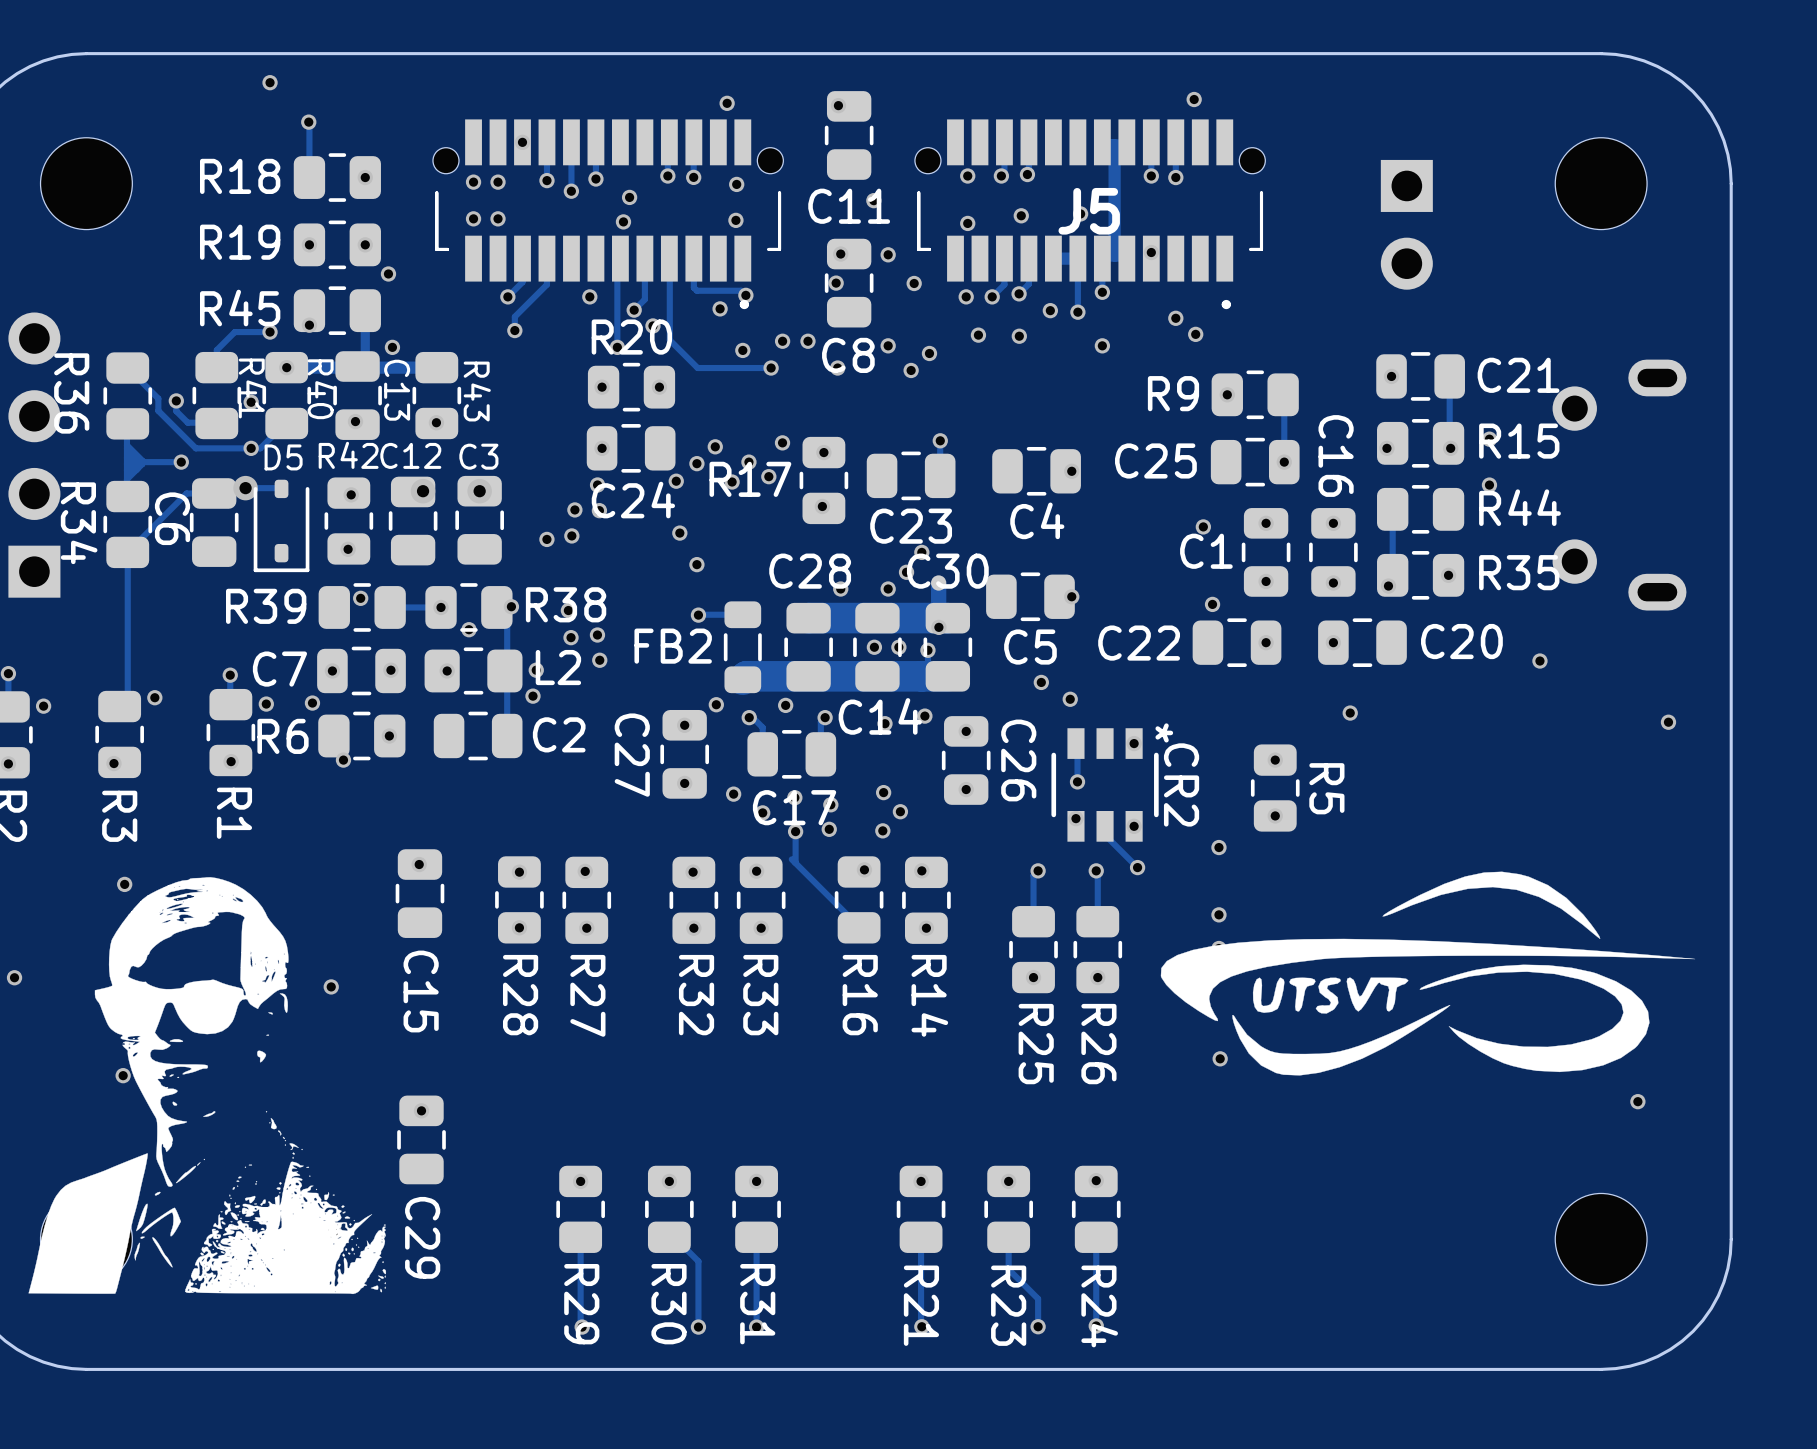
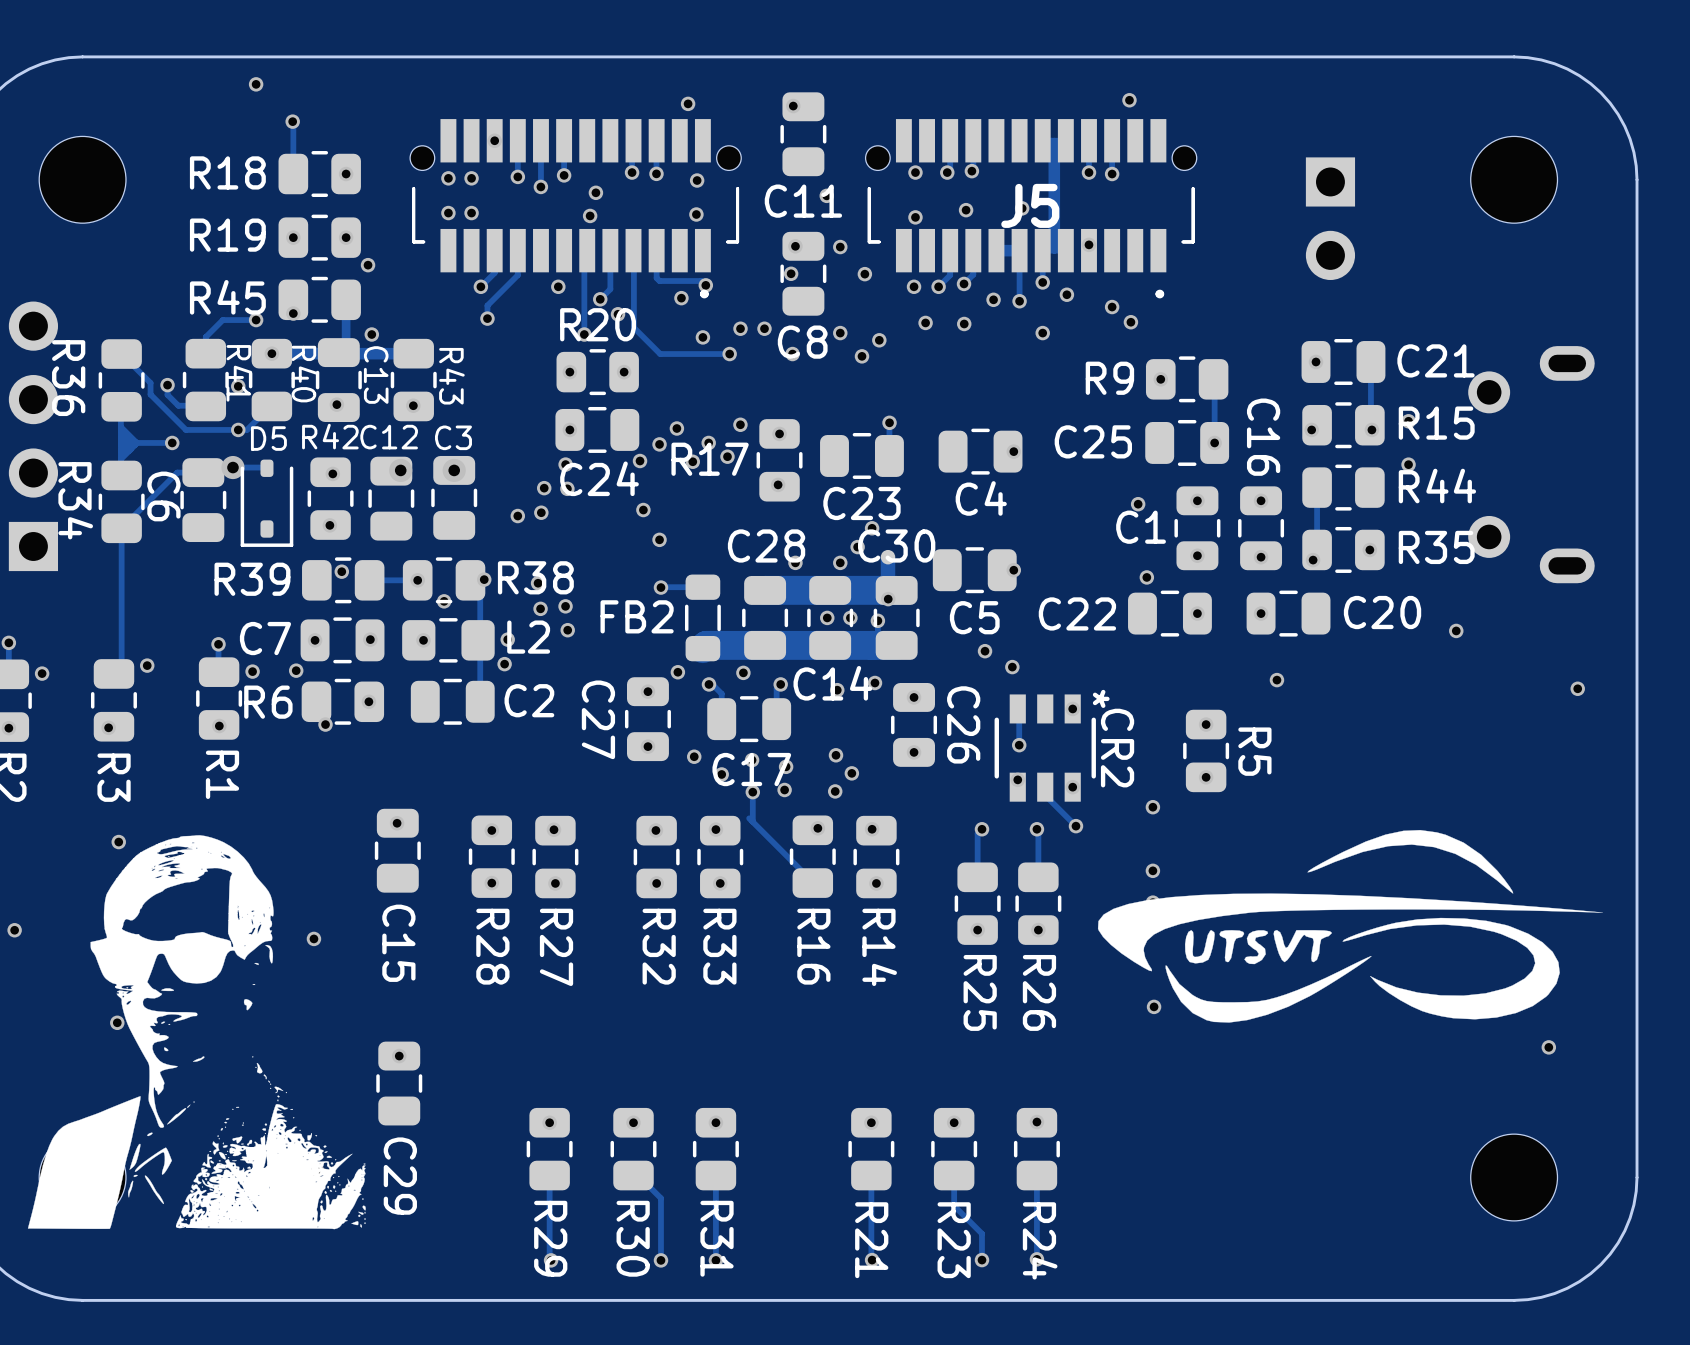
via: none -> (1066, 294)

